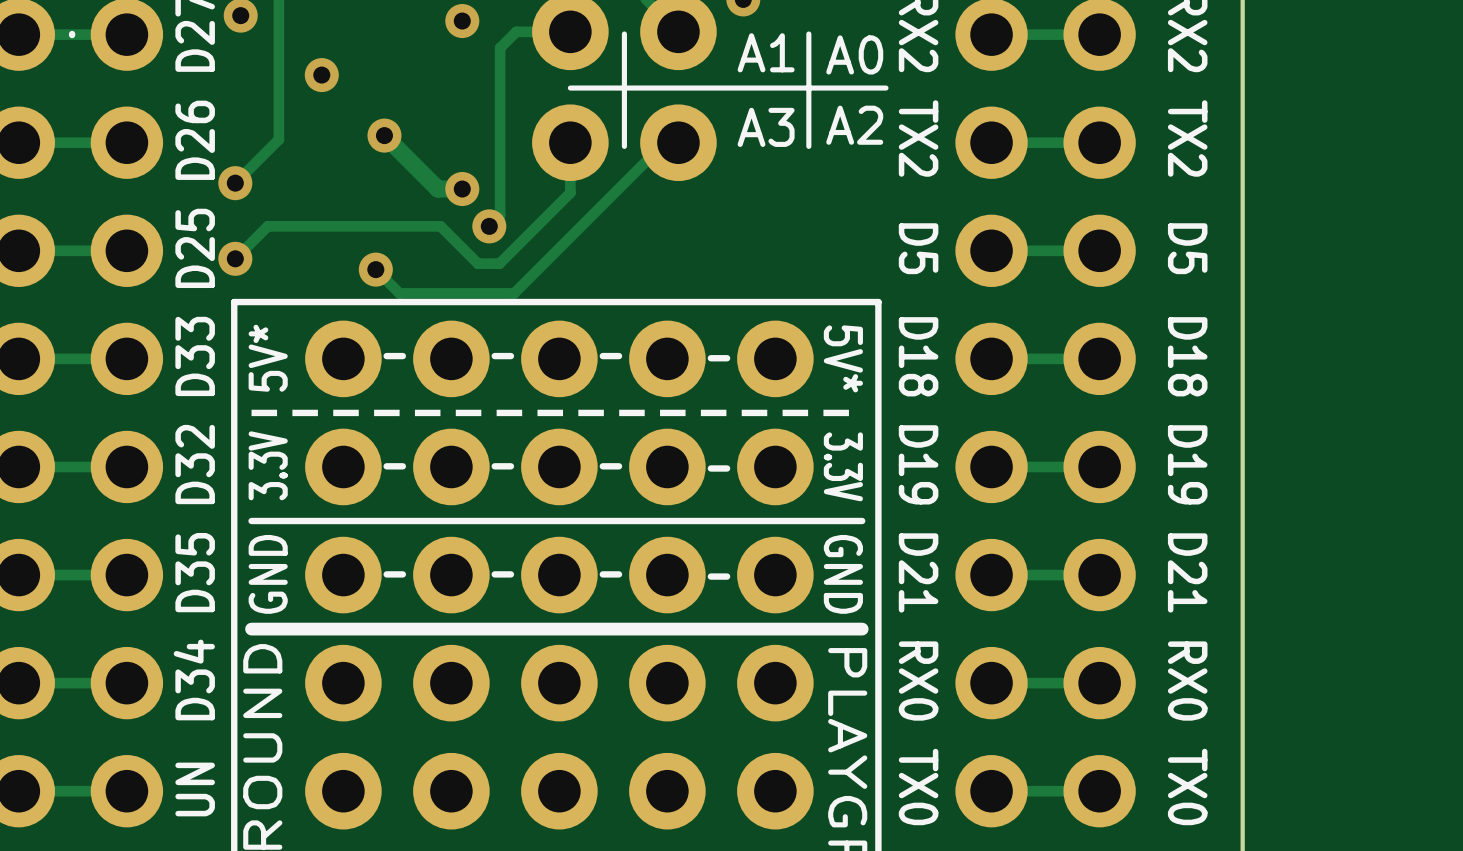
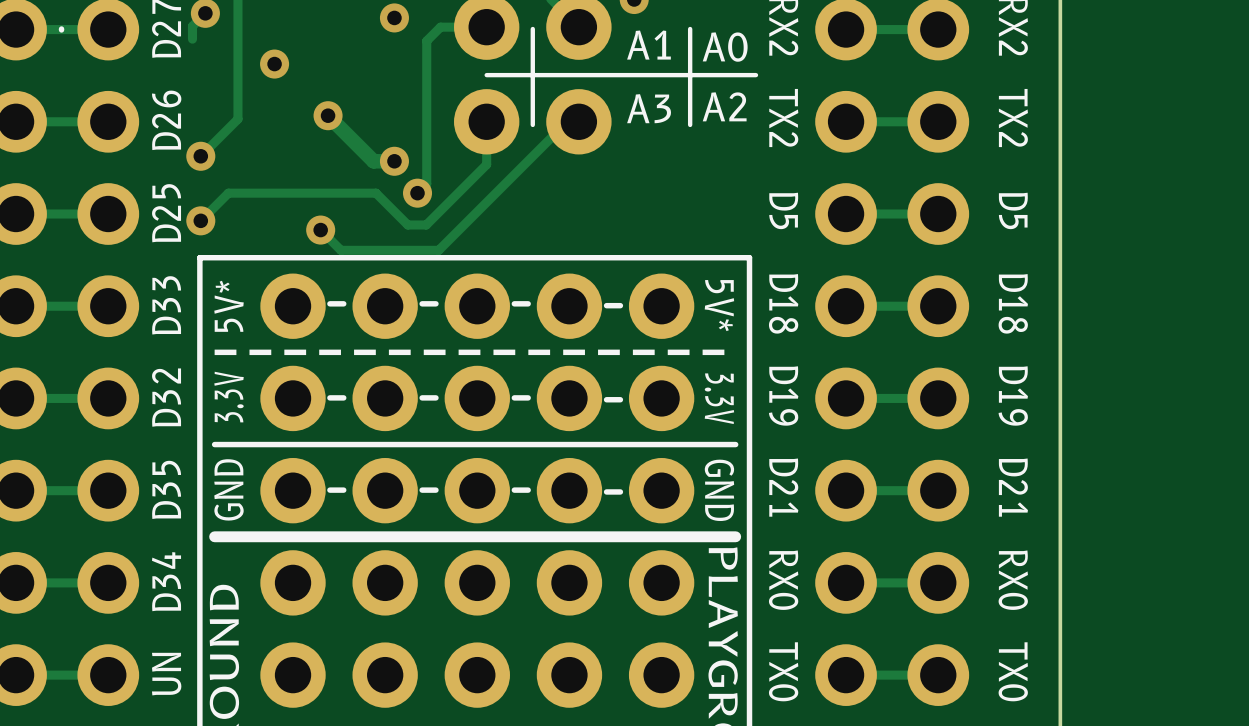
track: none -> (205, 13) (192, 26) (192, 39)

